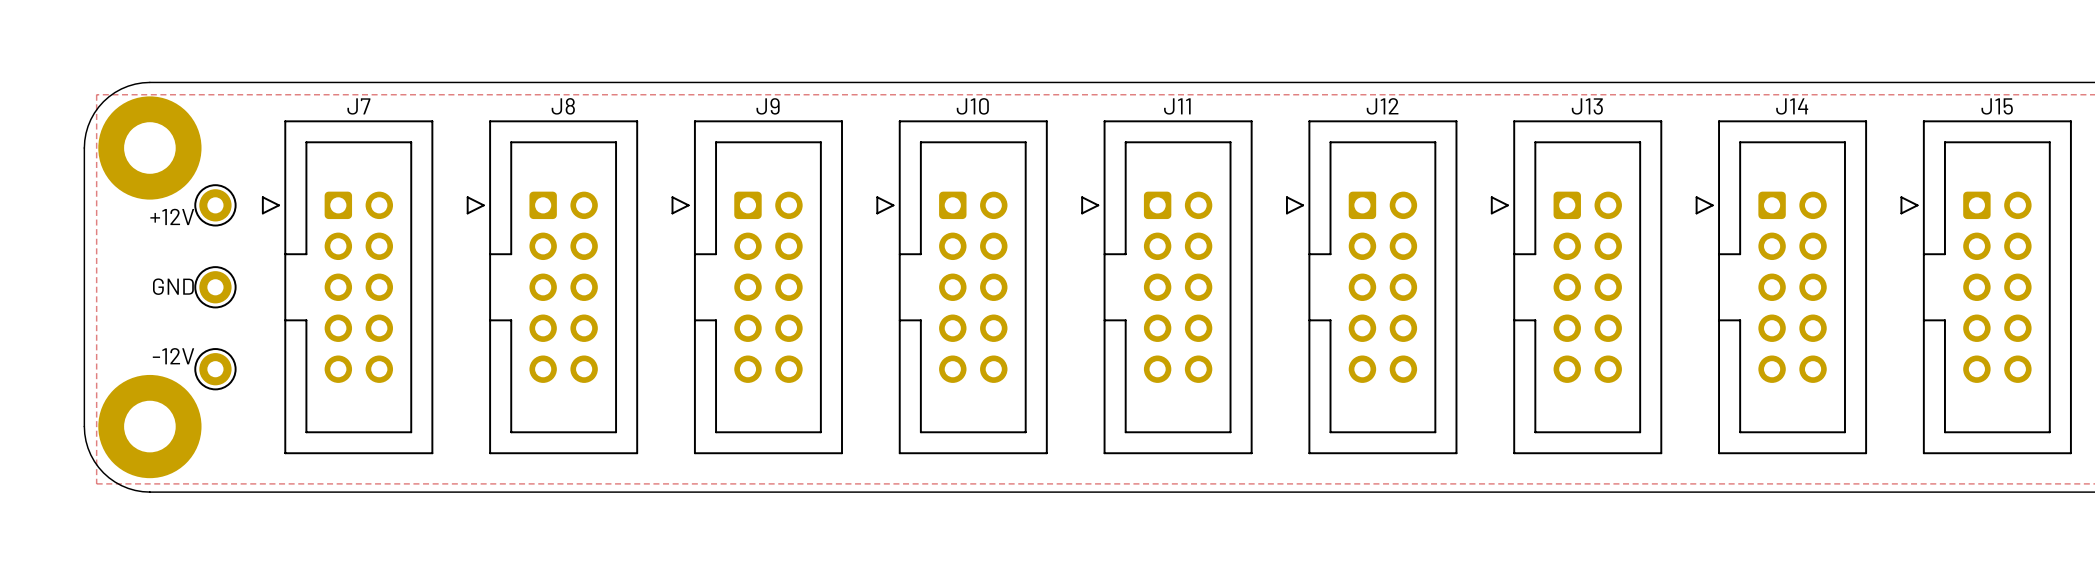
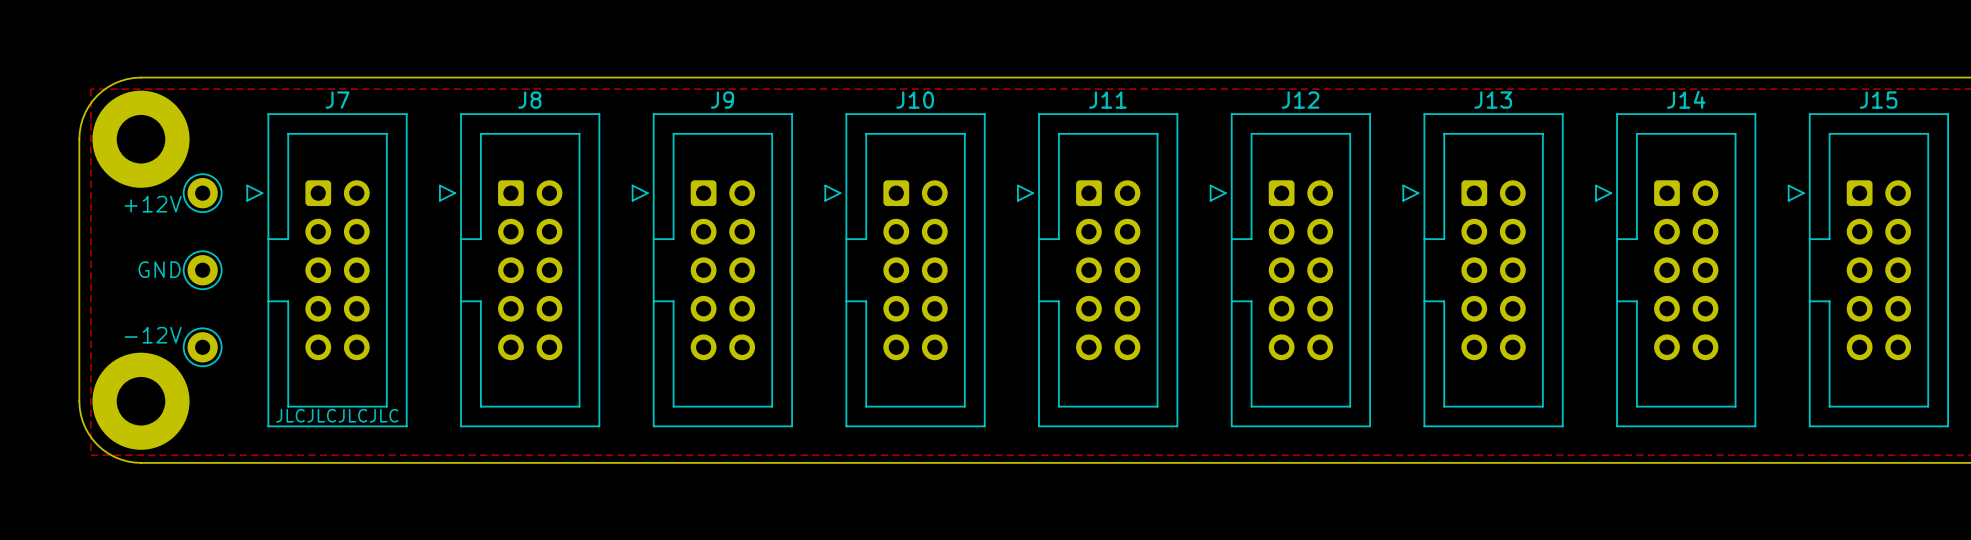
text: none -> JLCJLCJLCJLC (337, 415)

